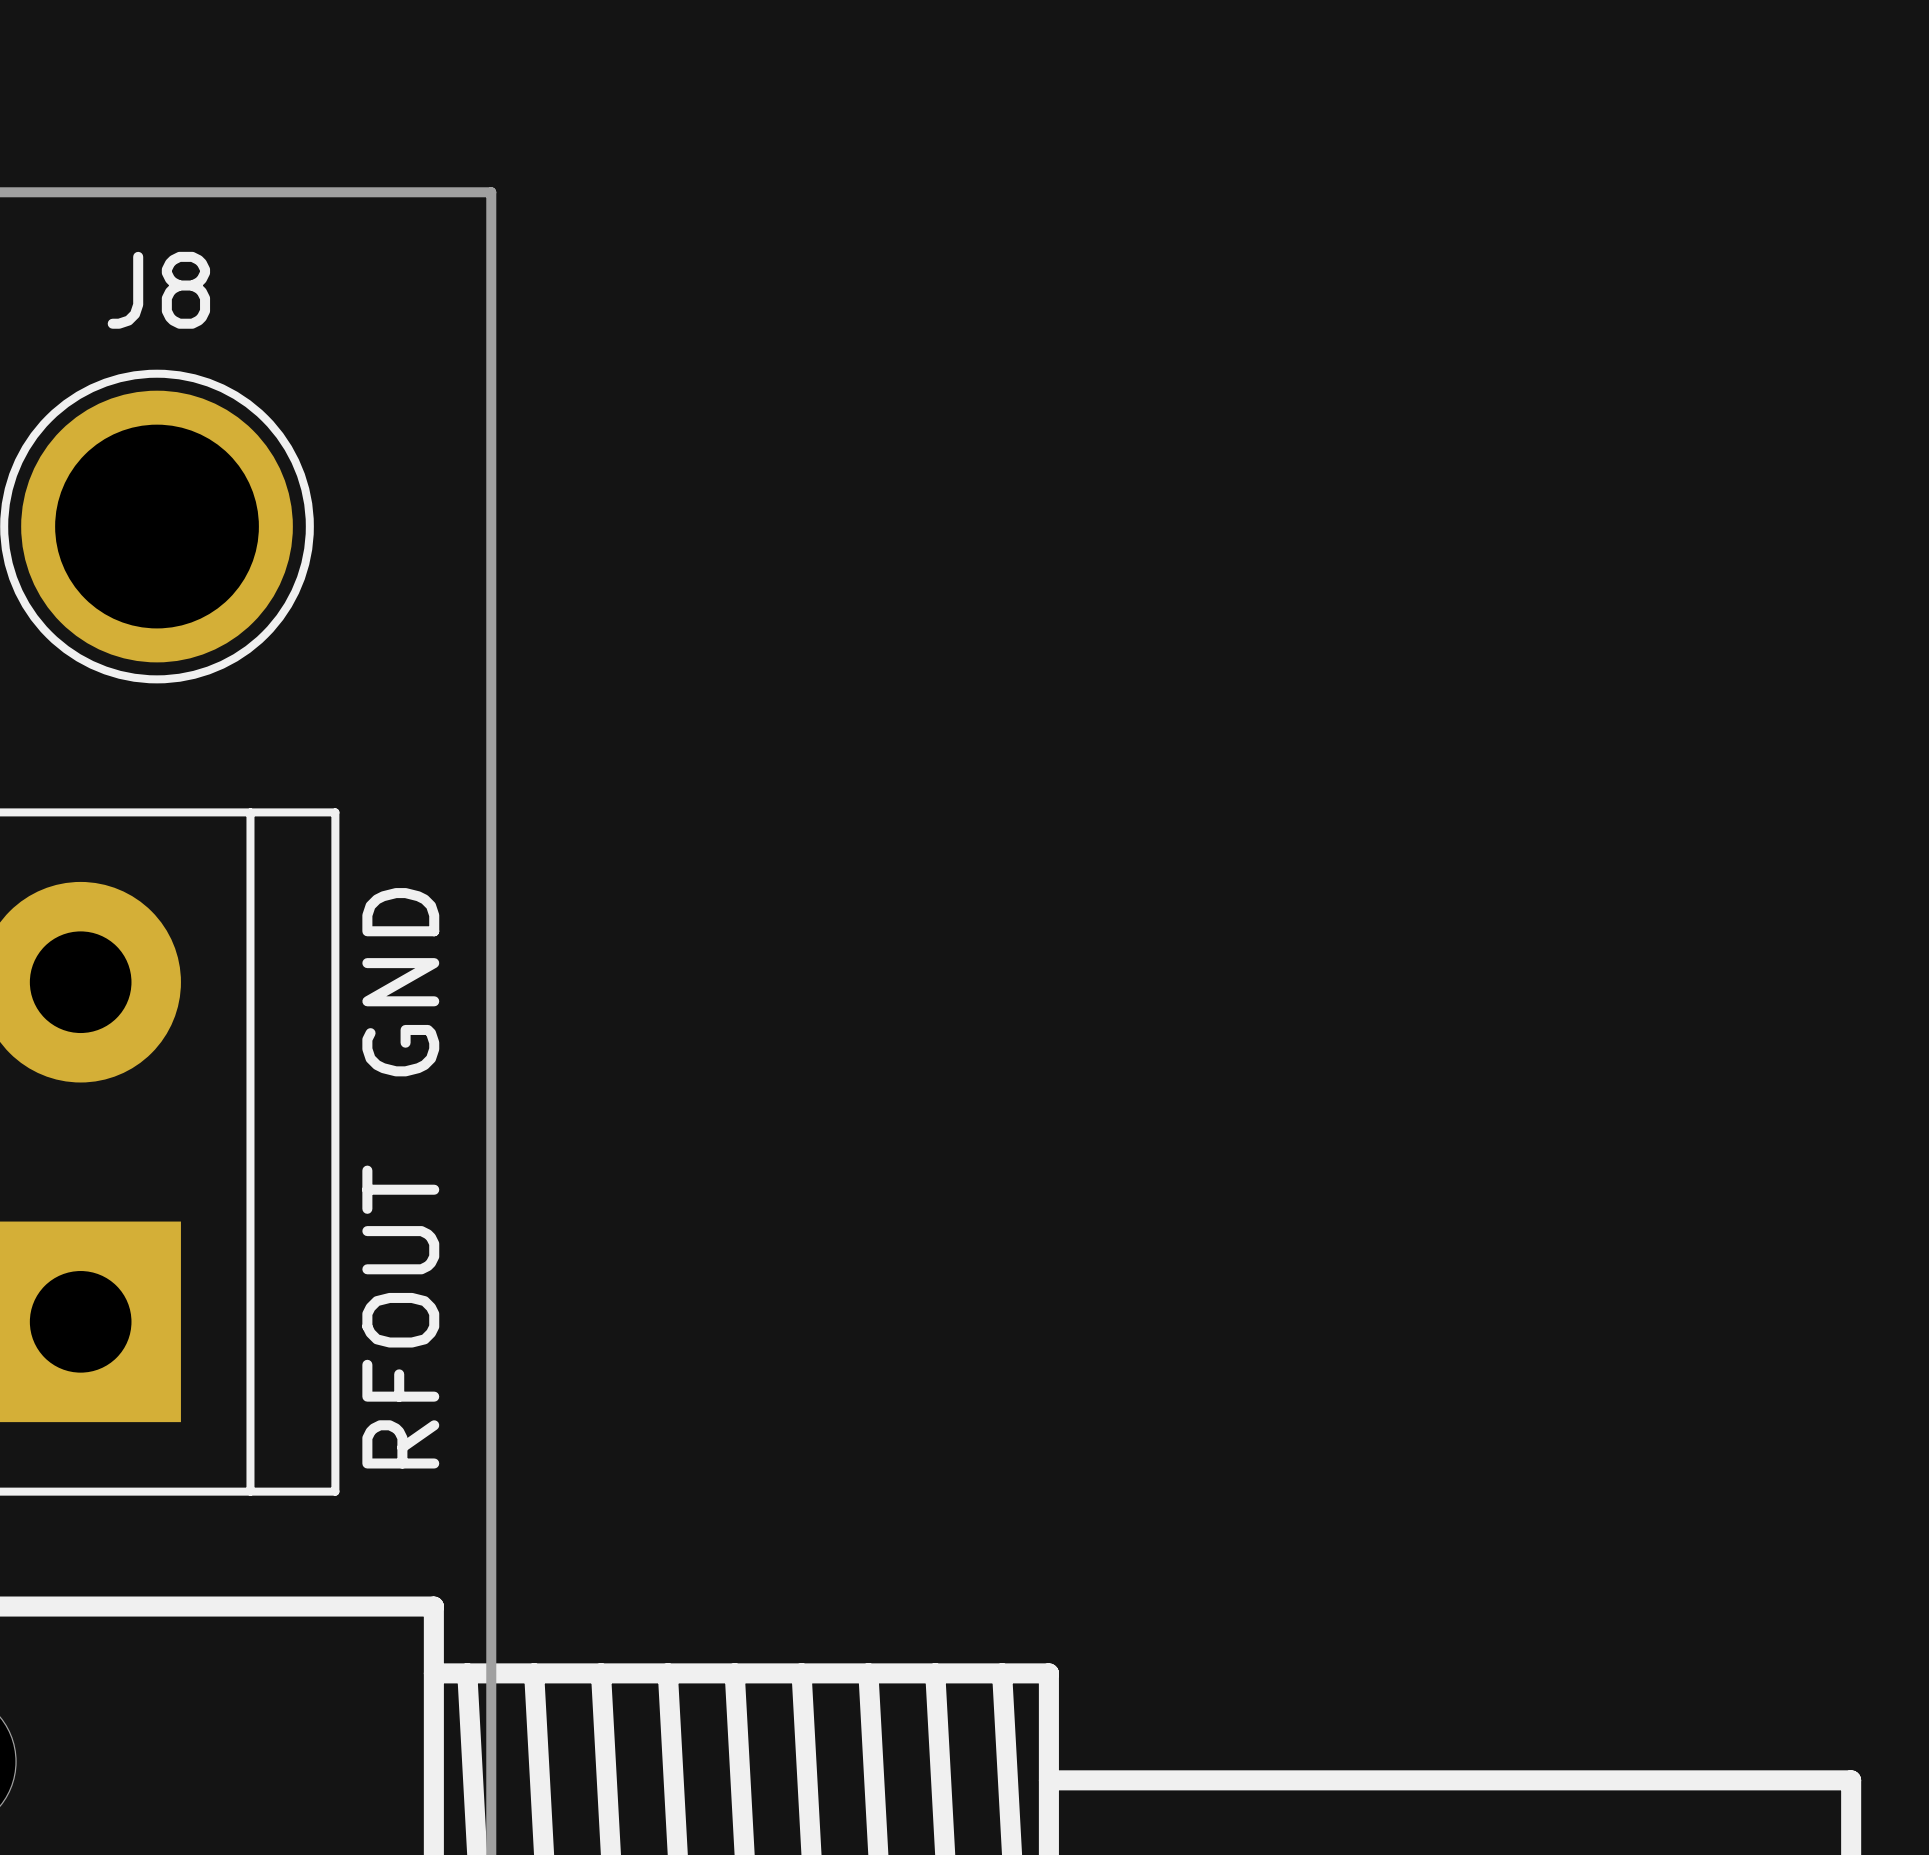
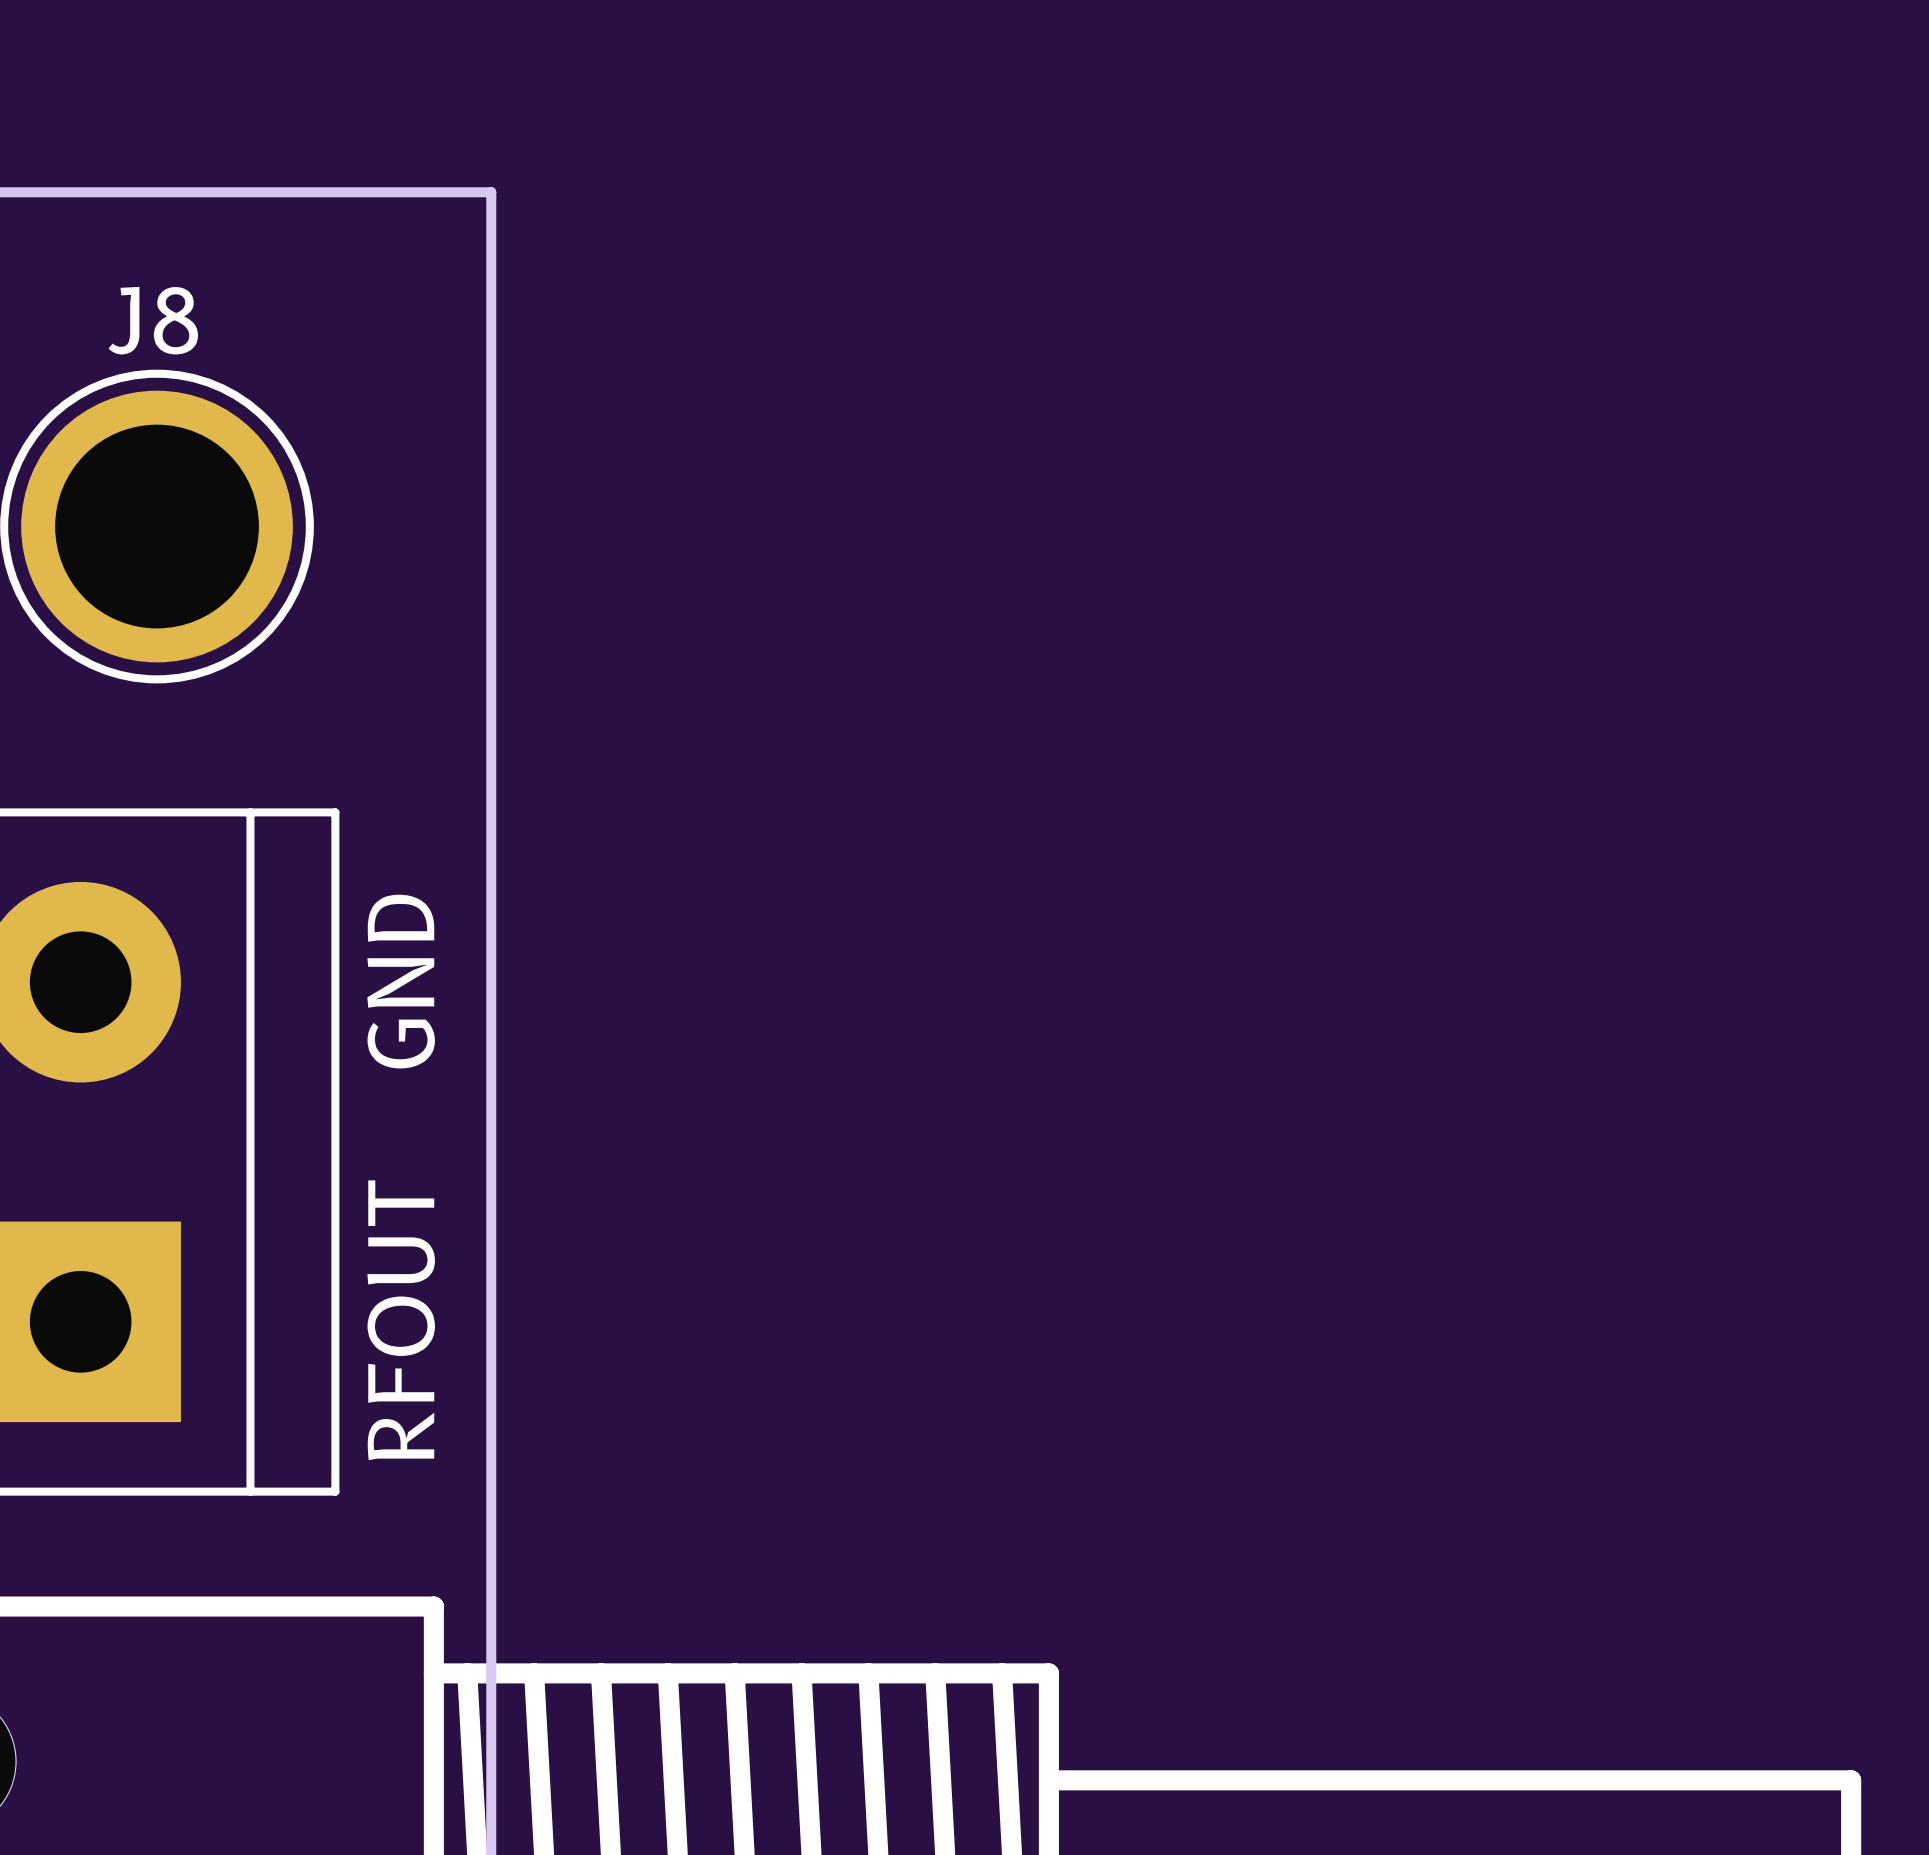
J8 name position: J8 (158, 290) -> J8 (153, 320)

